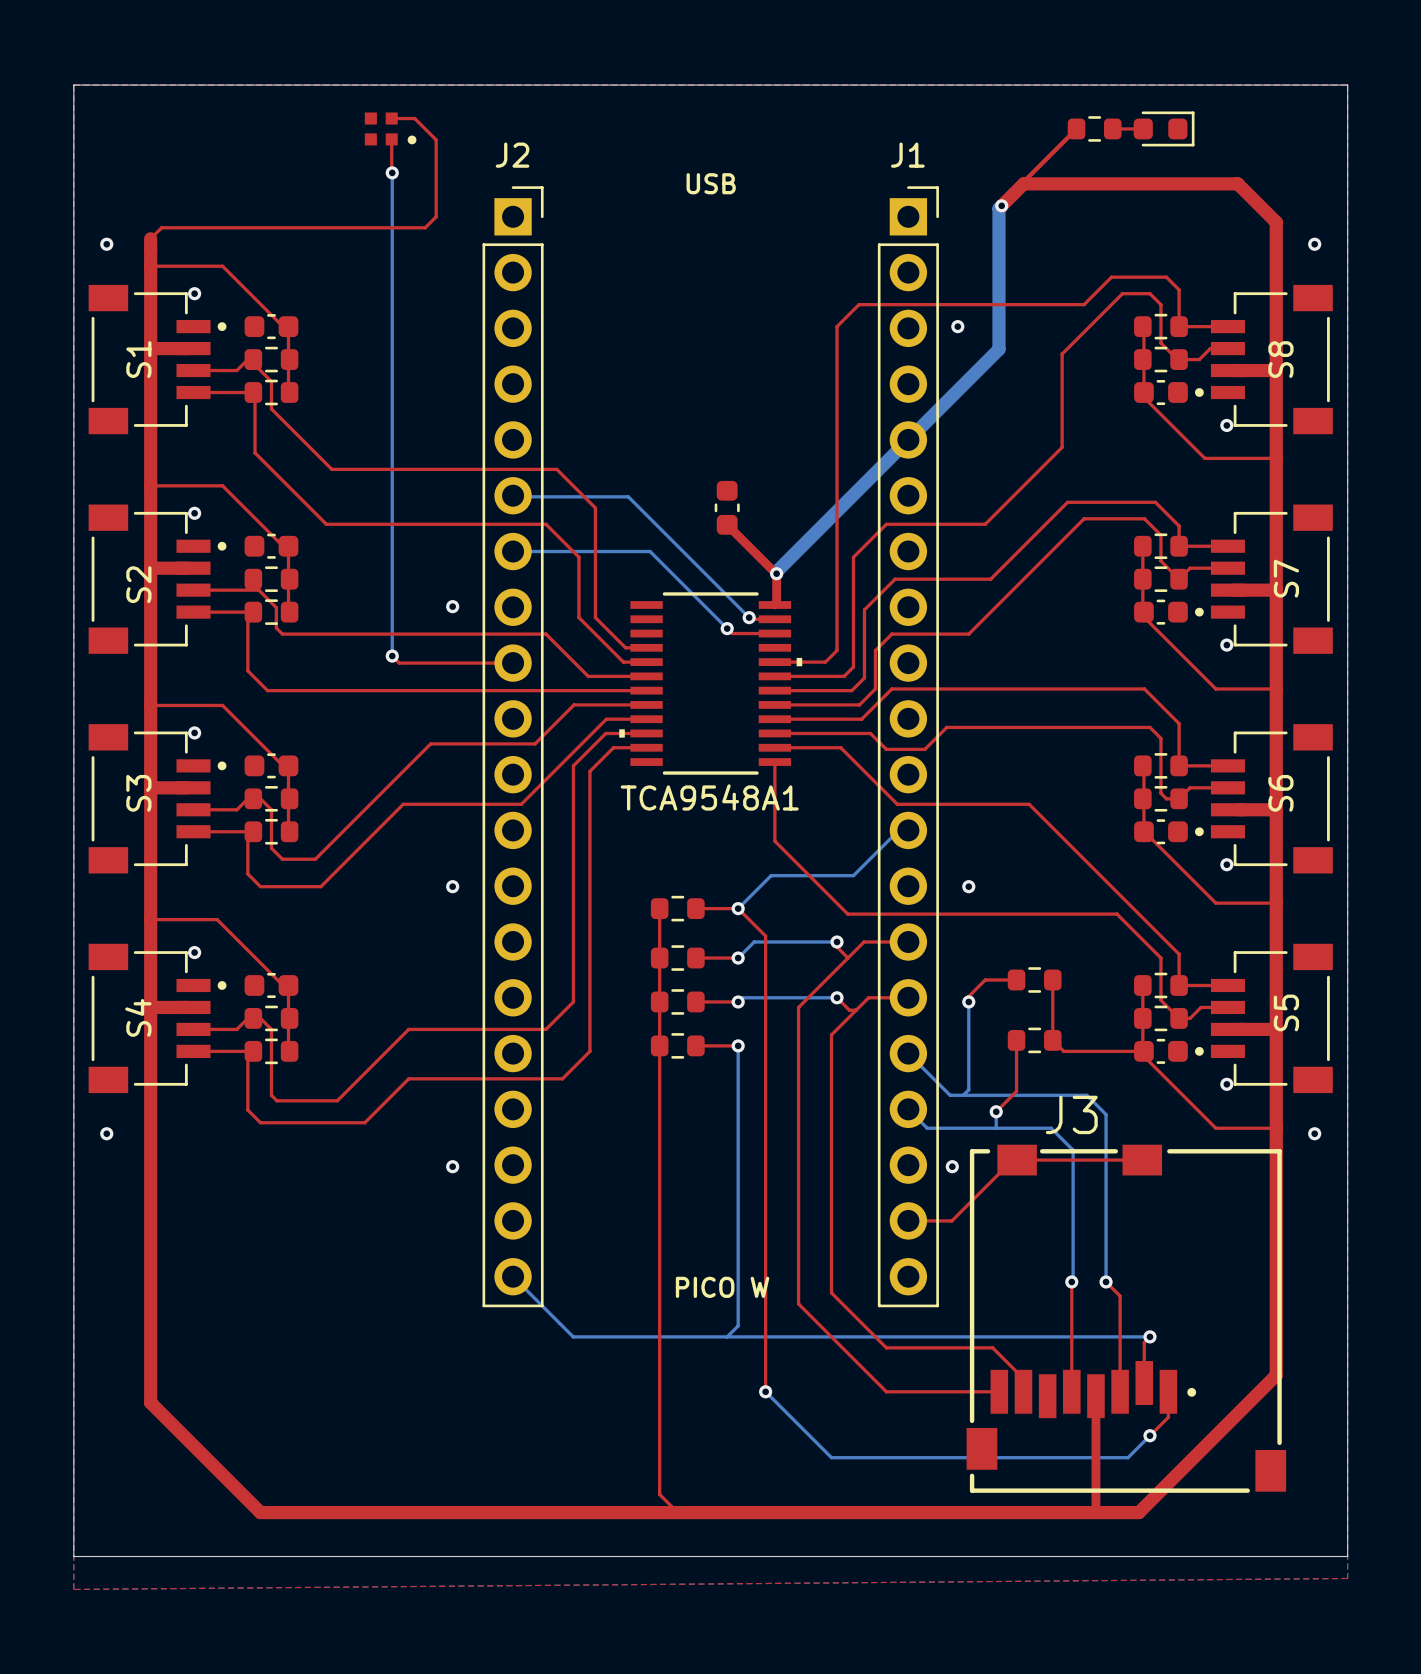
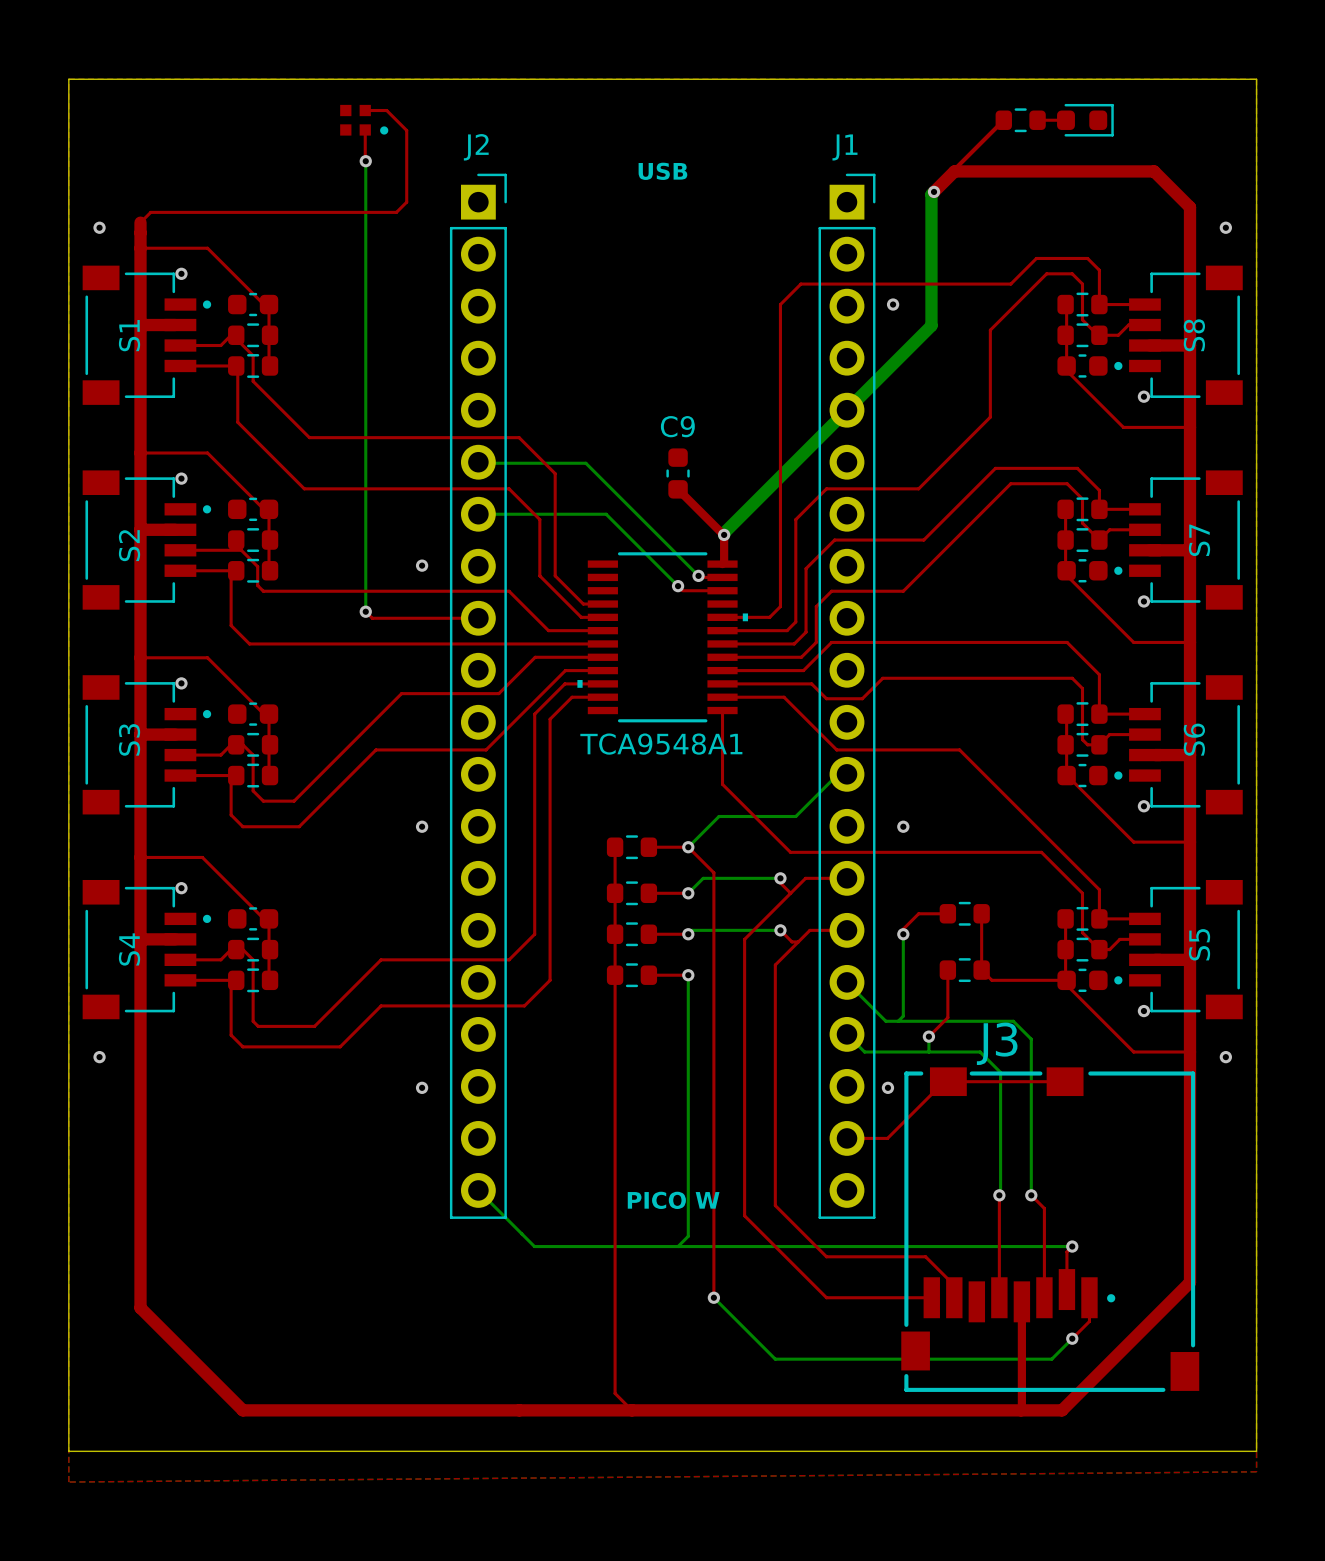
C9 name: none -> C9 (677, 426)

